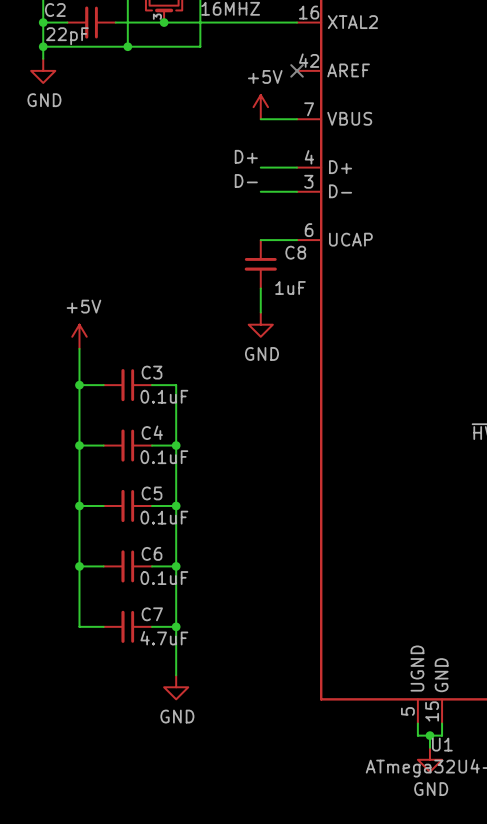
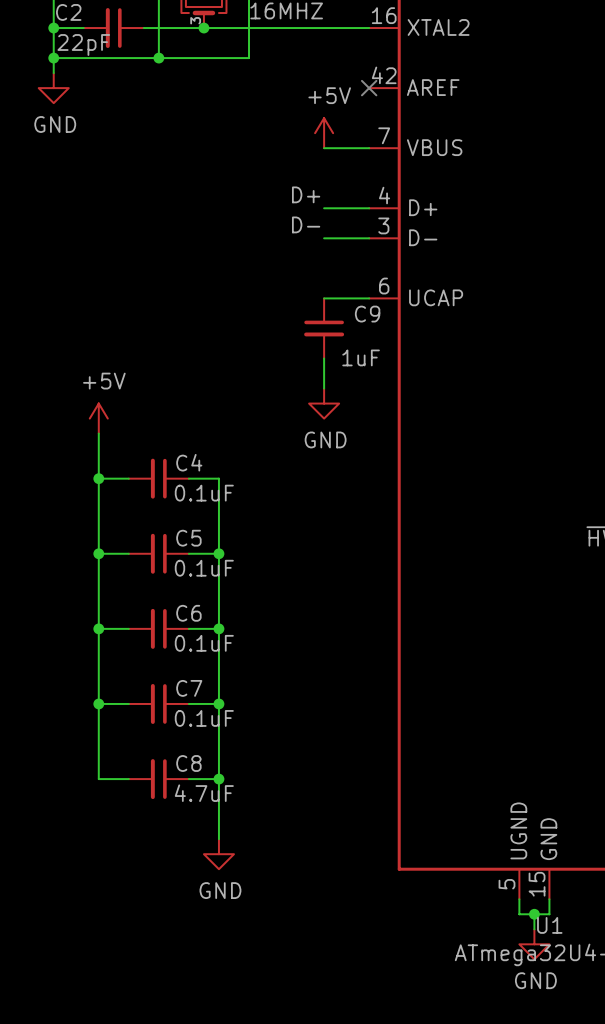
C8 name: C8 (295, 252) -> C9 (367, 314)
C3 name: C3 (152, 372) -> C4 (189, 462)
C4 name: C4 (152, 432) -> C5 (188, 538)
C5 name: C5 (152, 493) -> C6 (188, 613)
C6 name: C6 (152, 553) -> C7 (189, 688)
C7 name: C7 (152, 614) -> C8 (188, 763)

